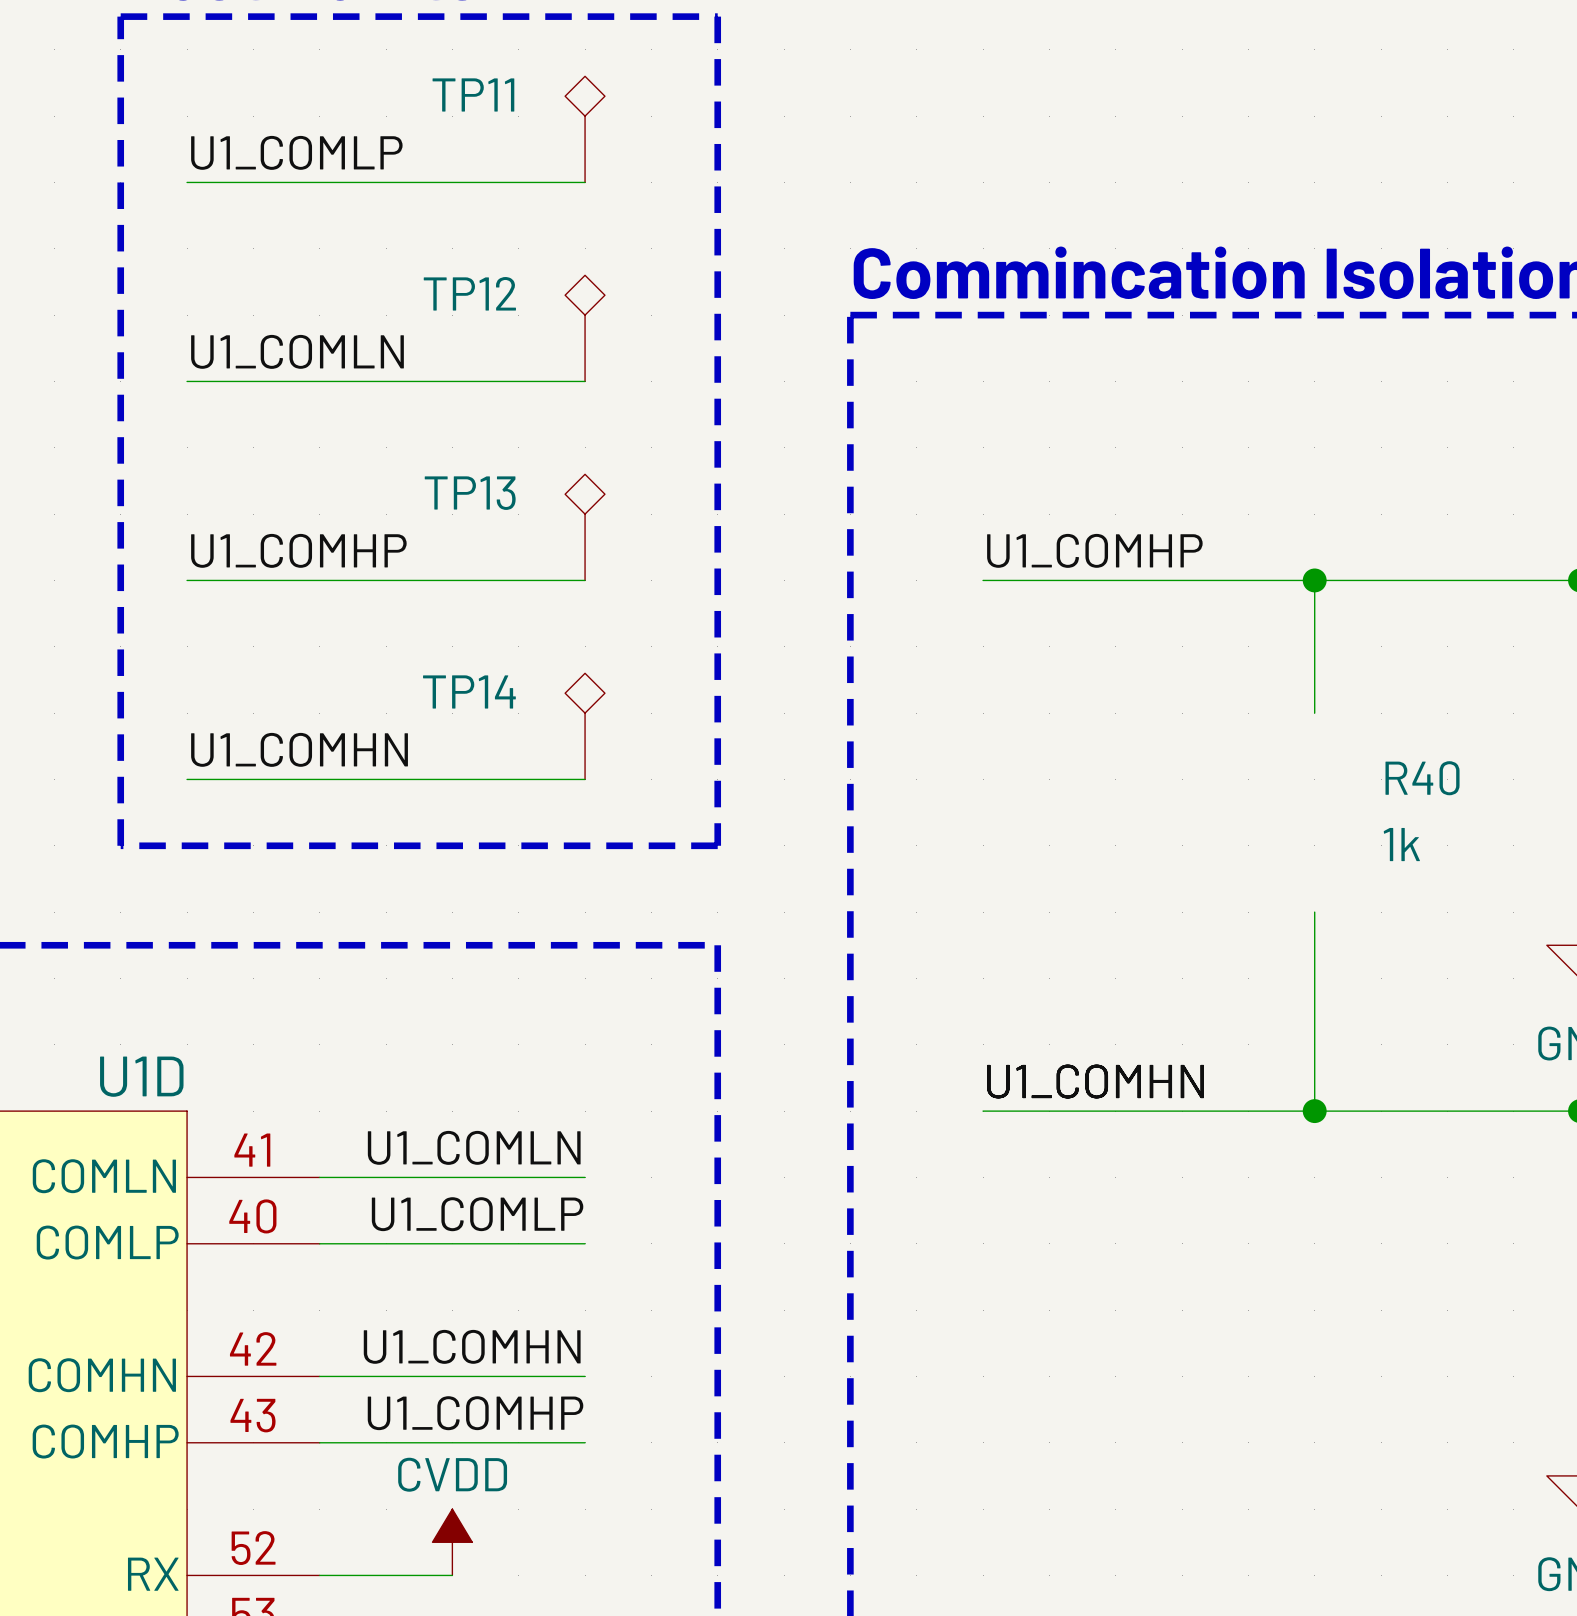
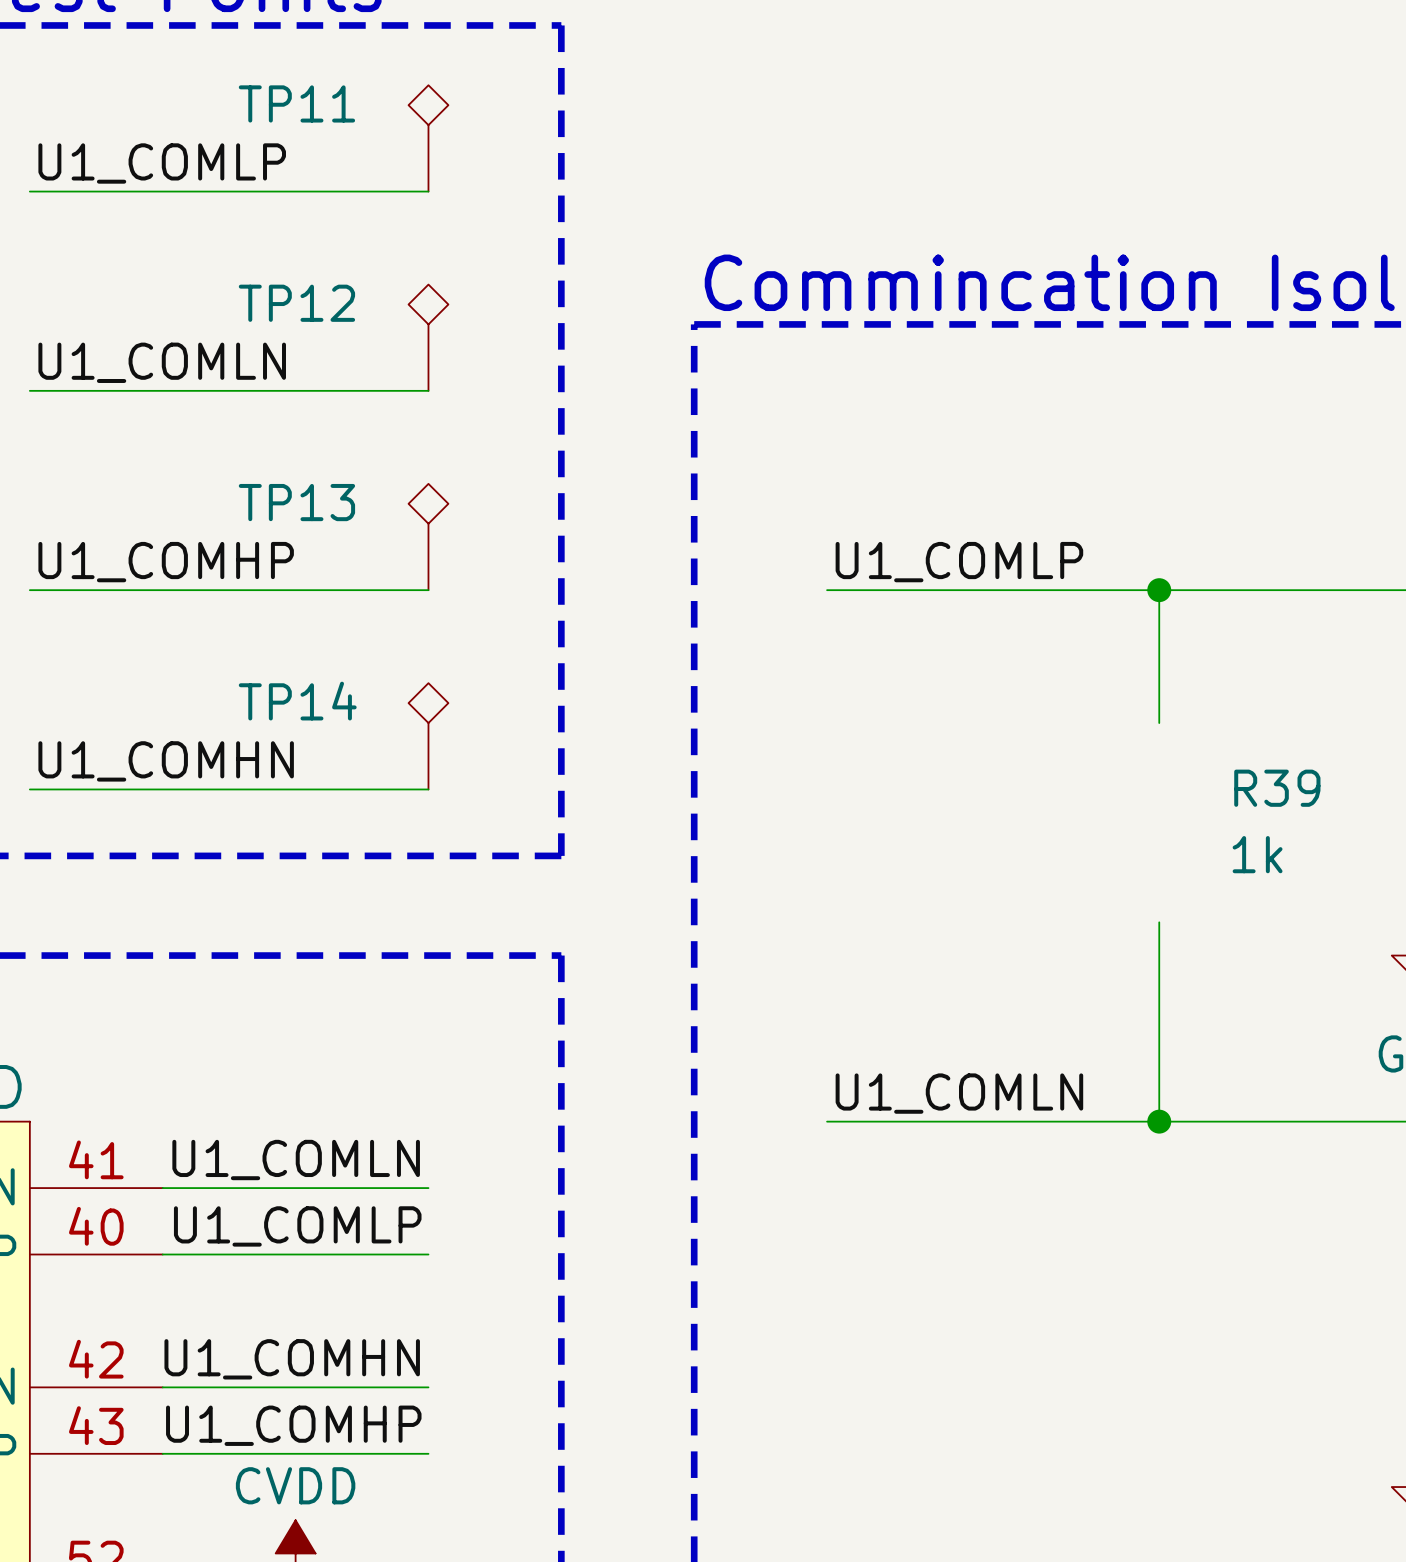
label: U1_COMHP (1094, 550) -> U1_COMLP (959, 562)
R40 name: R40 (1422, 778) -> R39 (1277, 788)
label: U1_COMHN (1095, 1081) -> U1_COMLN (959, 1093)

